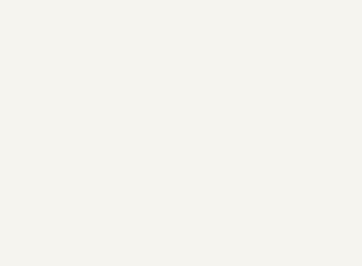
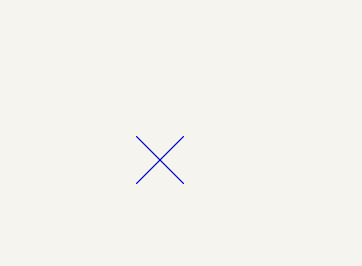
no-connect mark: none -> (160, 160)

